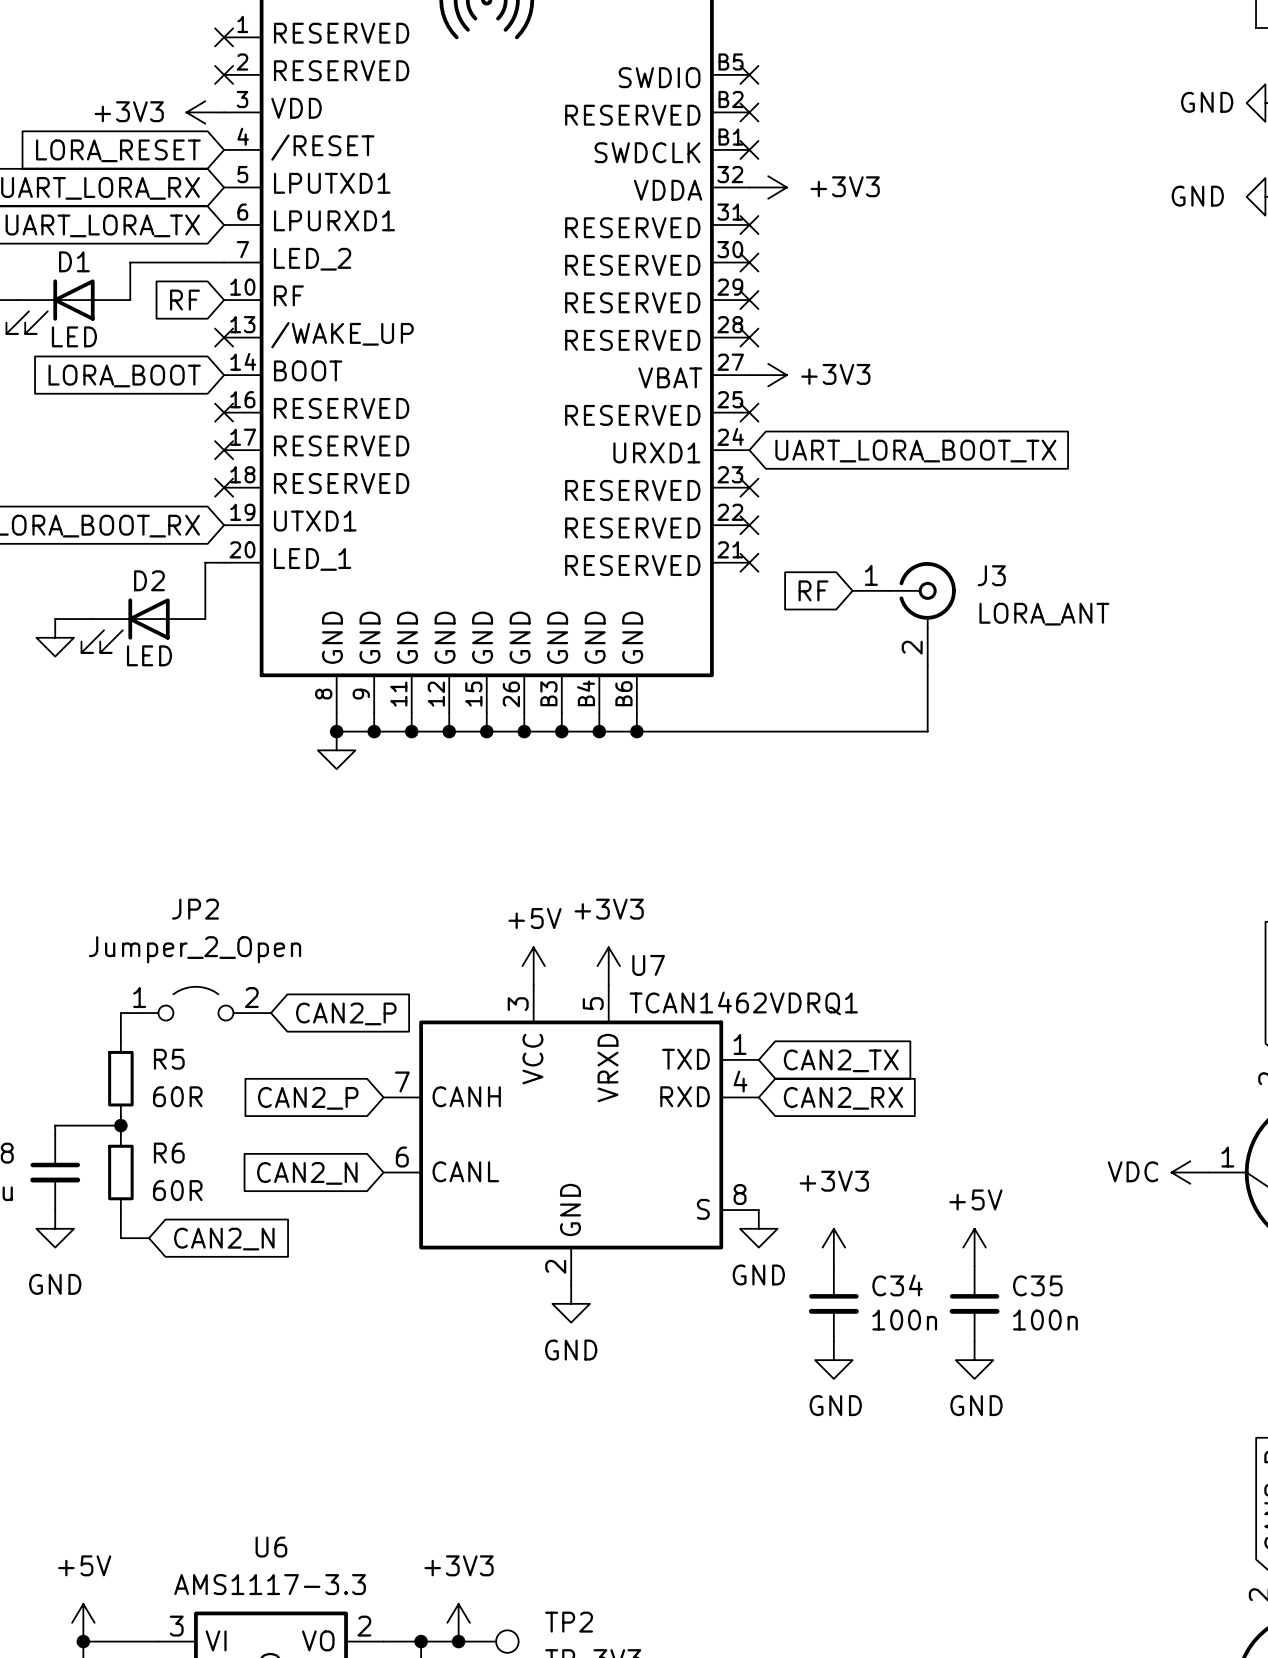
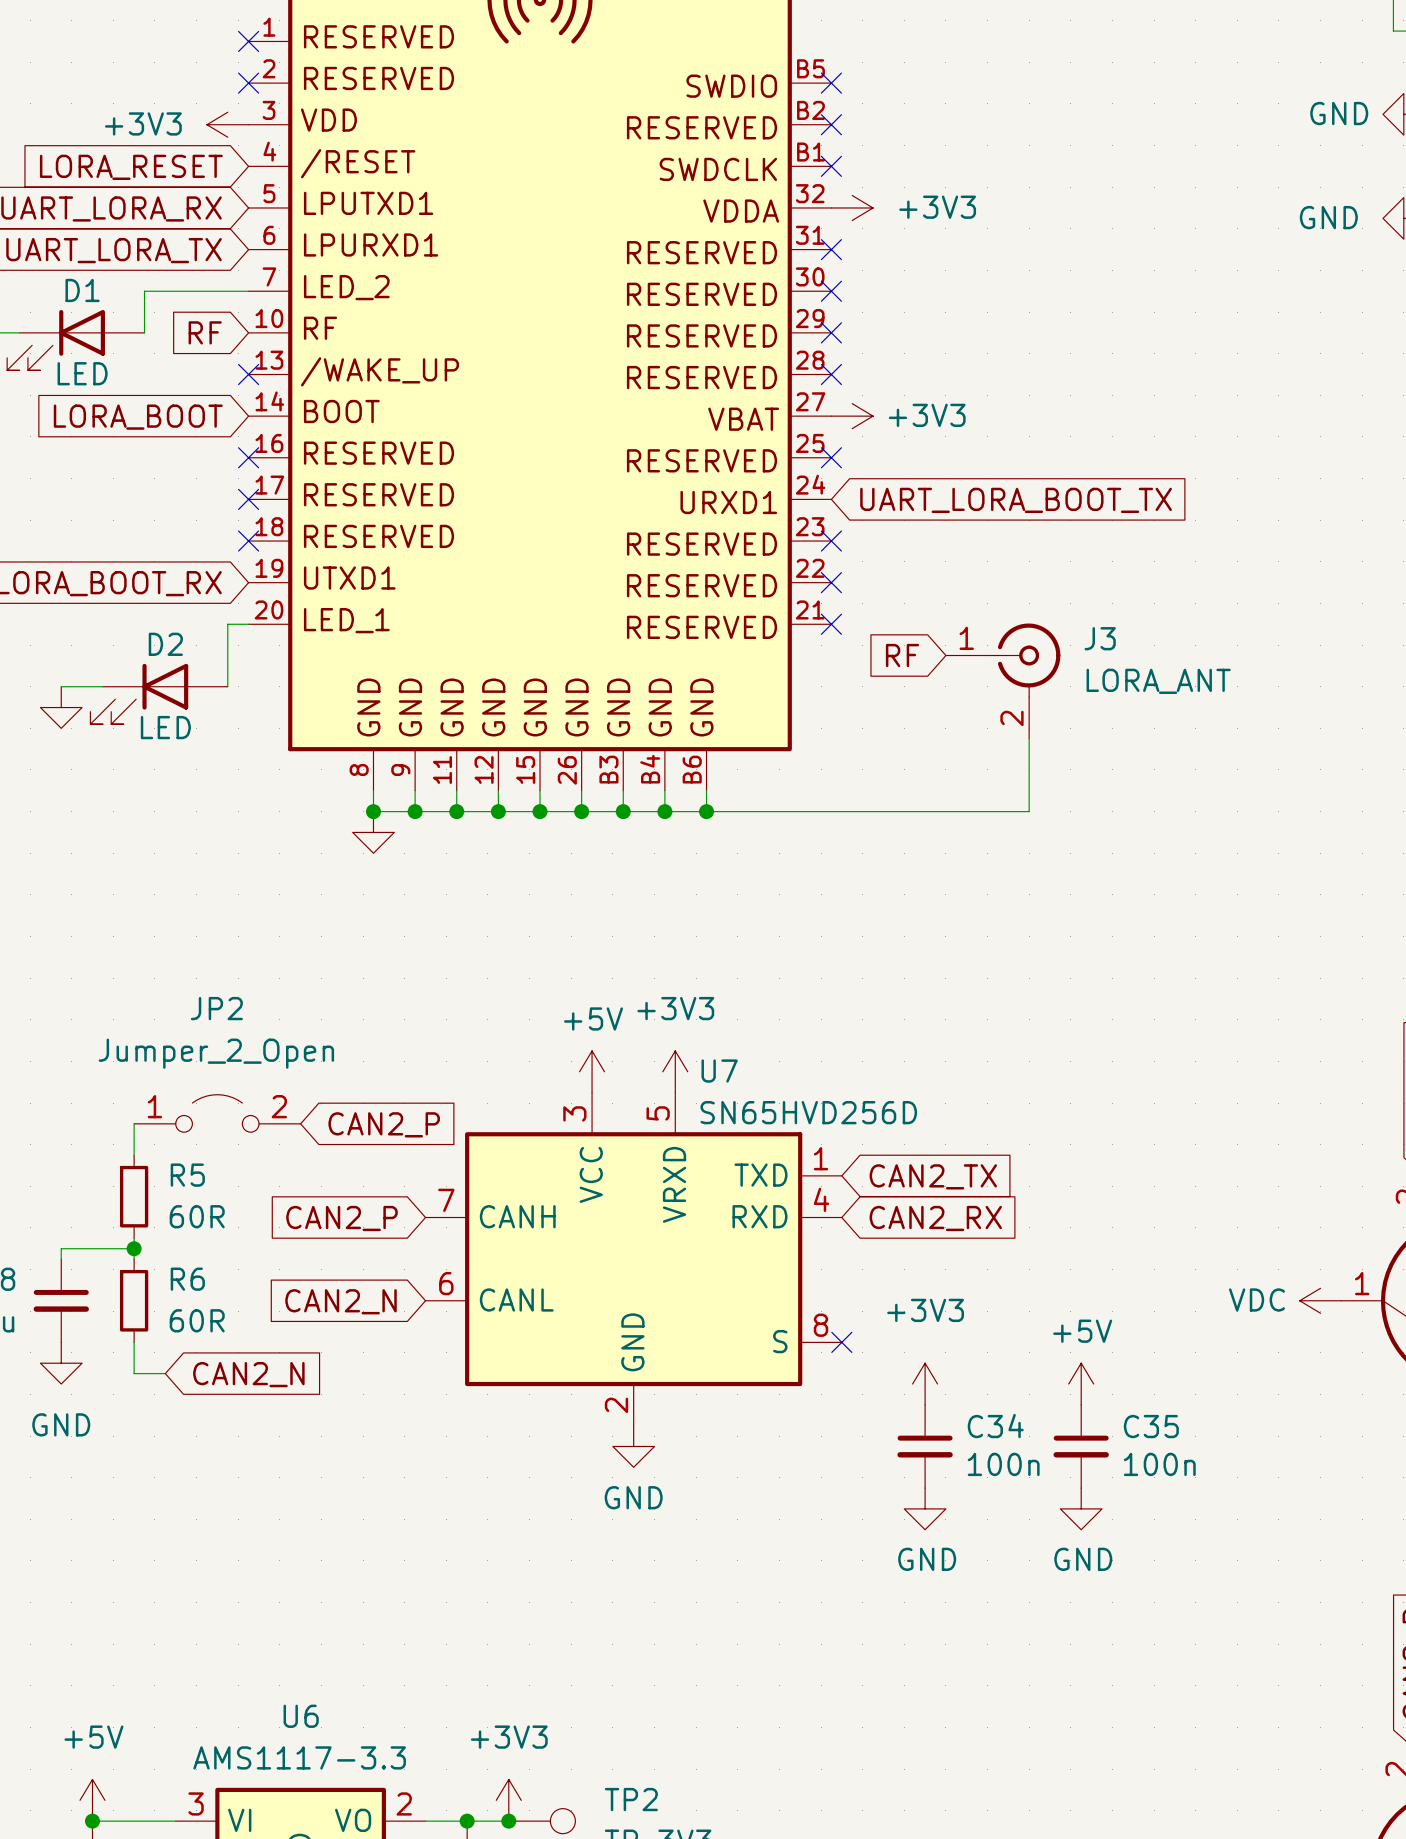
U7 value: TCAN1462VDRQ1 (743, 1003) -> SN65HVD256D (808, 1112)
no-connect mark: none -> (841, 1342)
power symbol: GND (758, 1228) -> none

